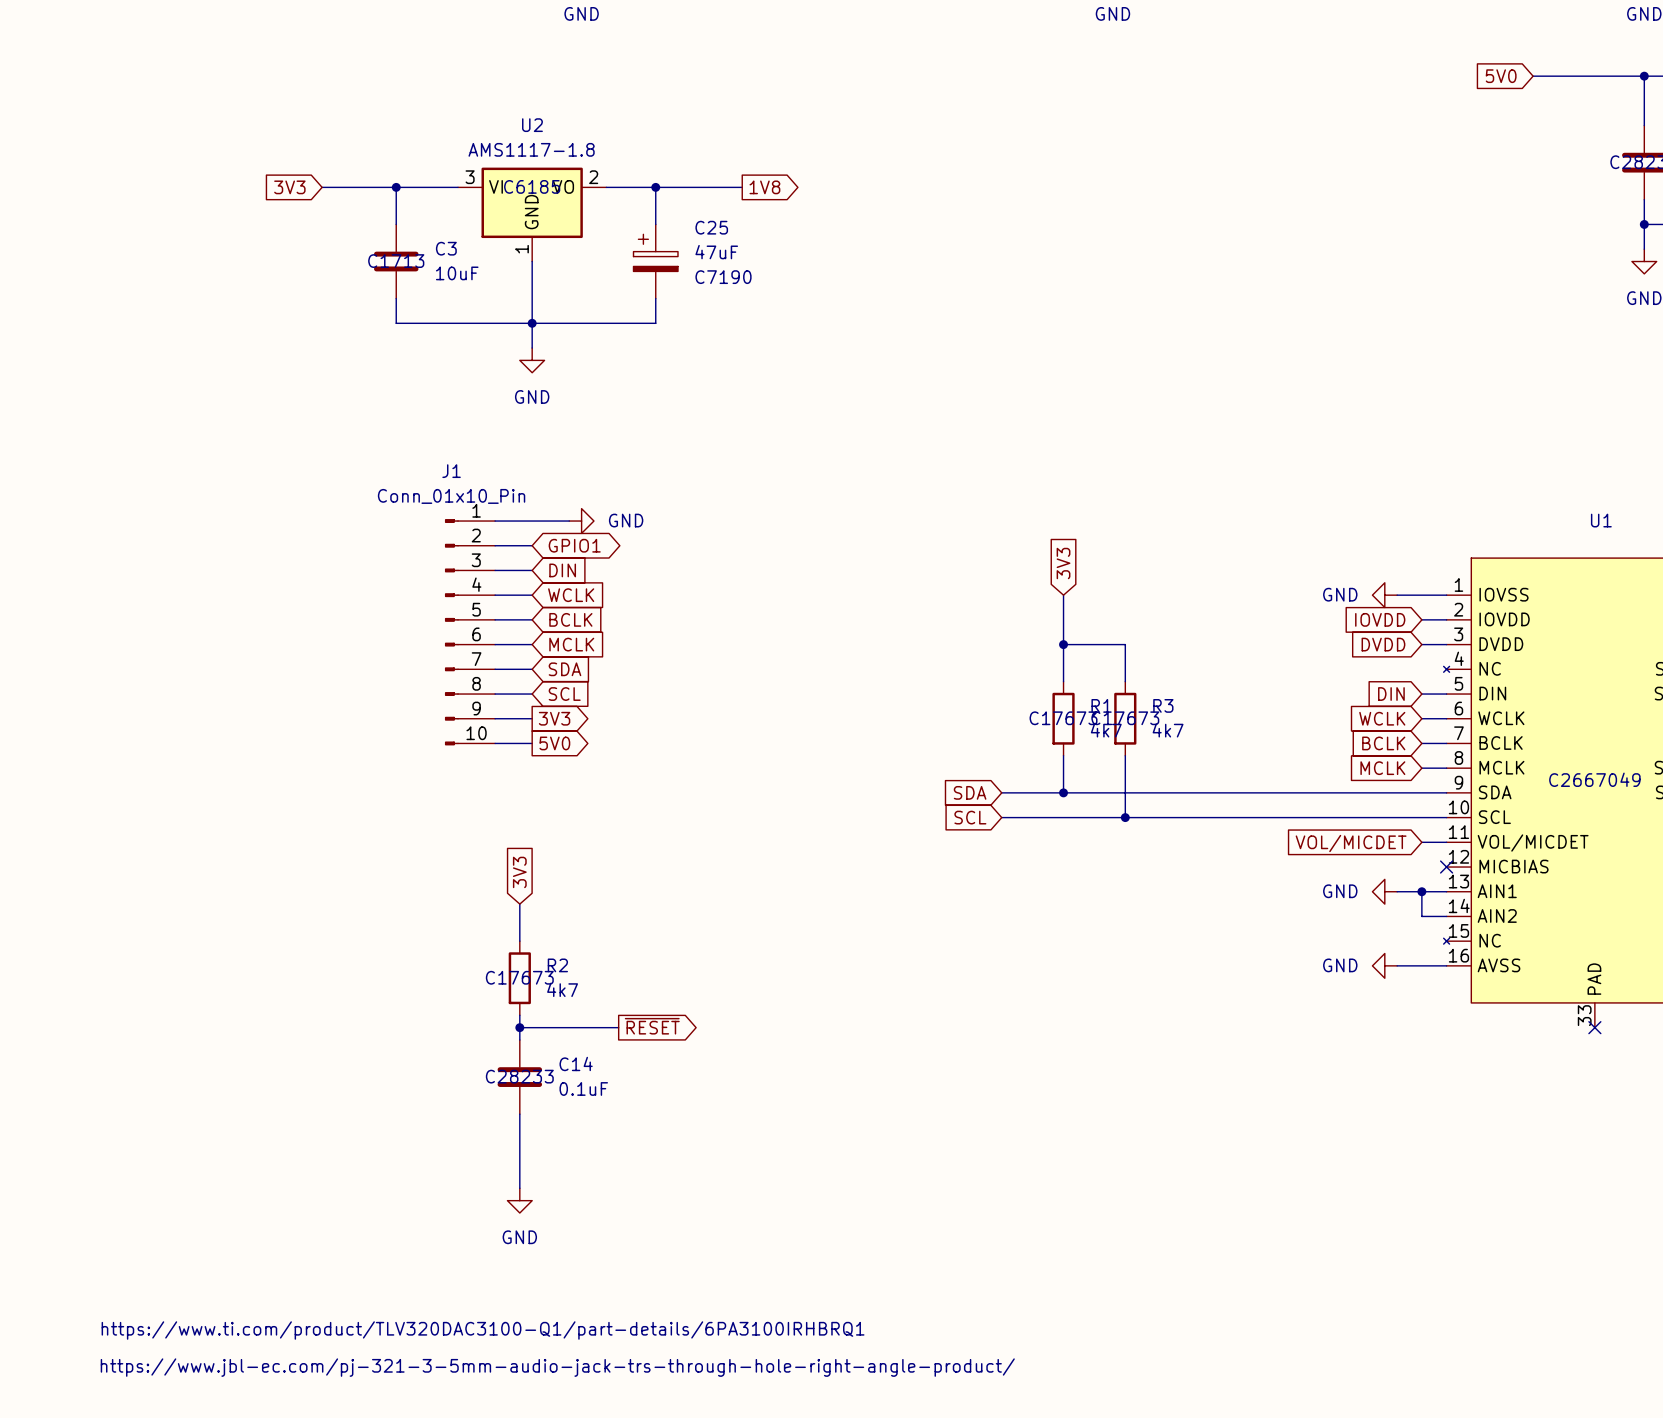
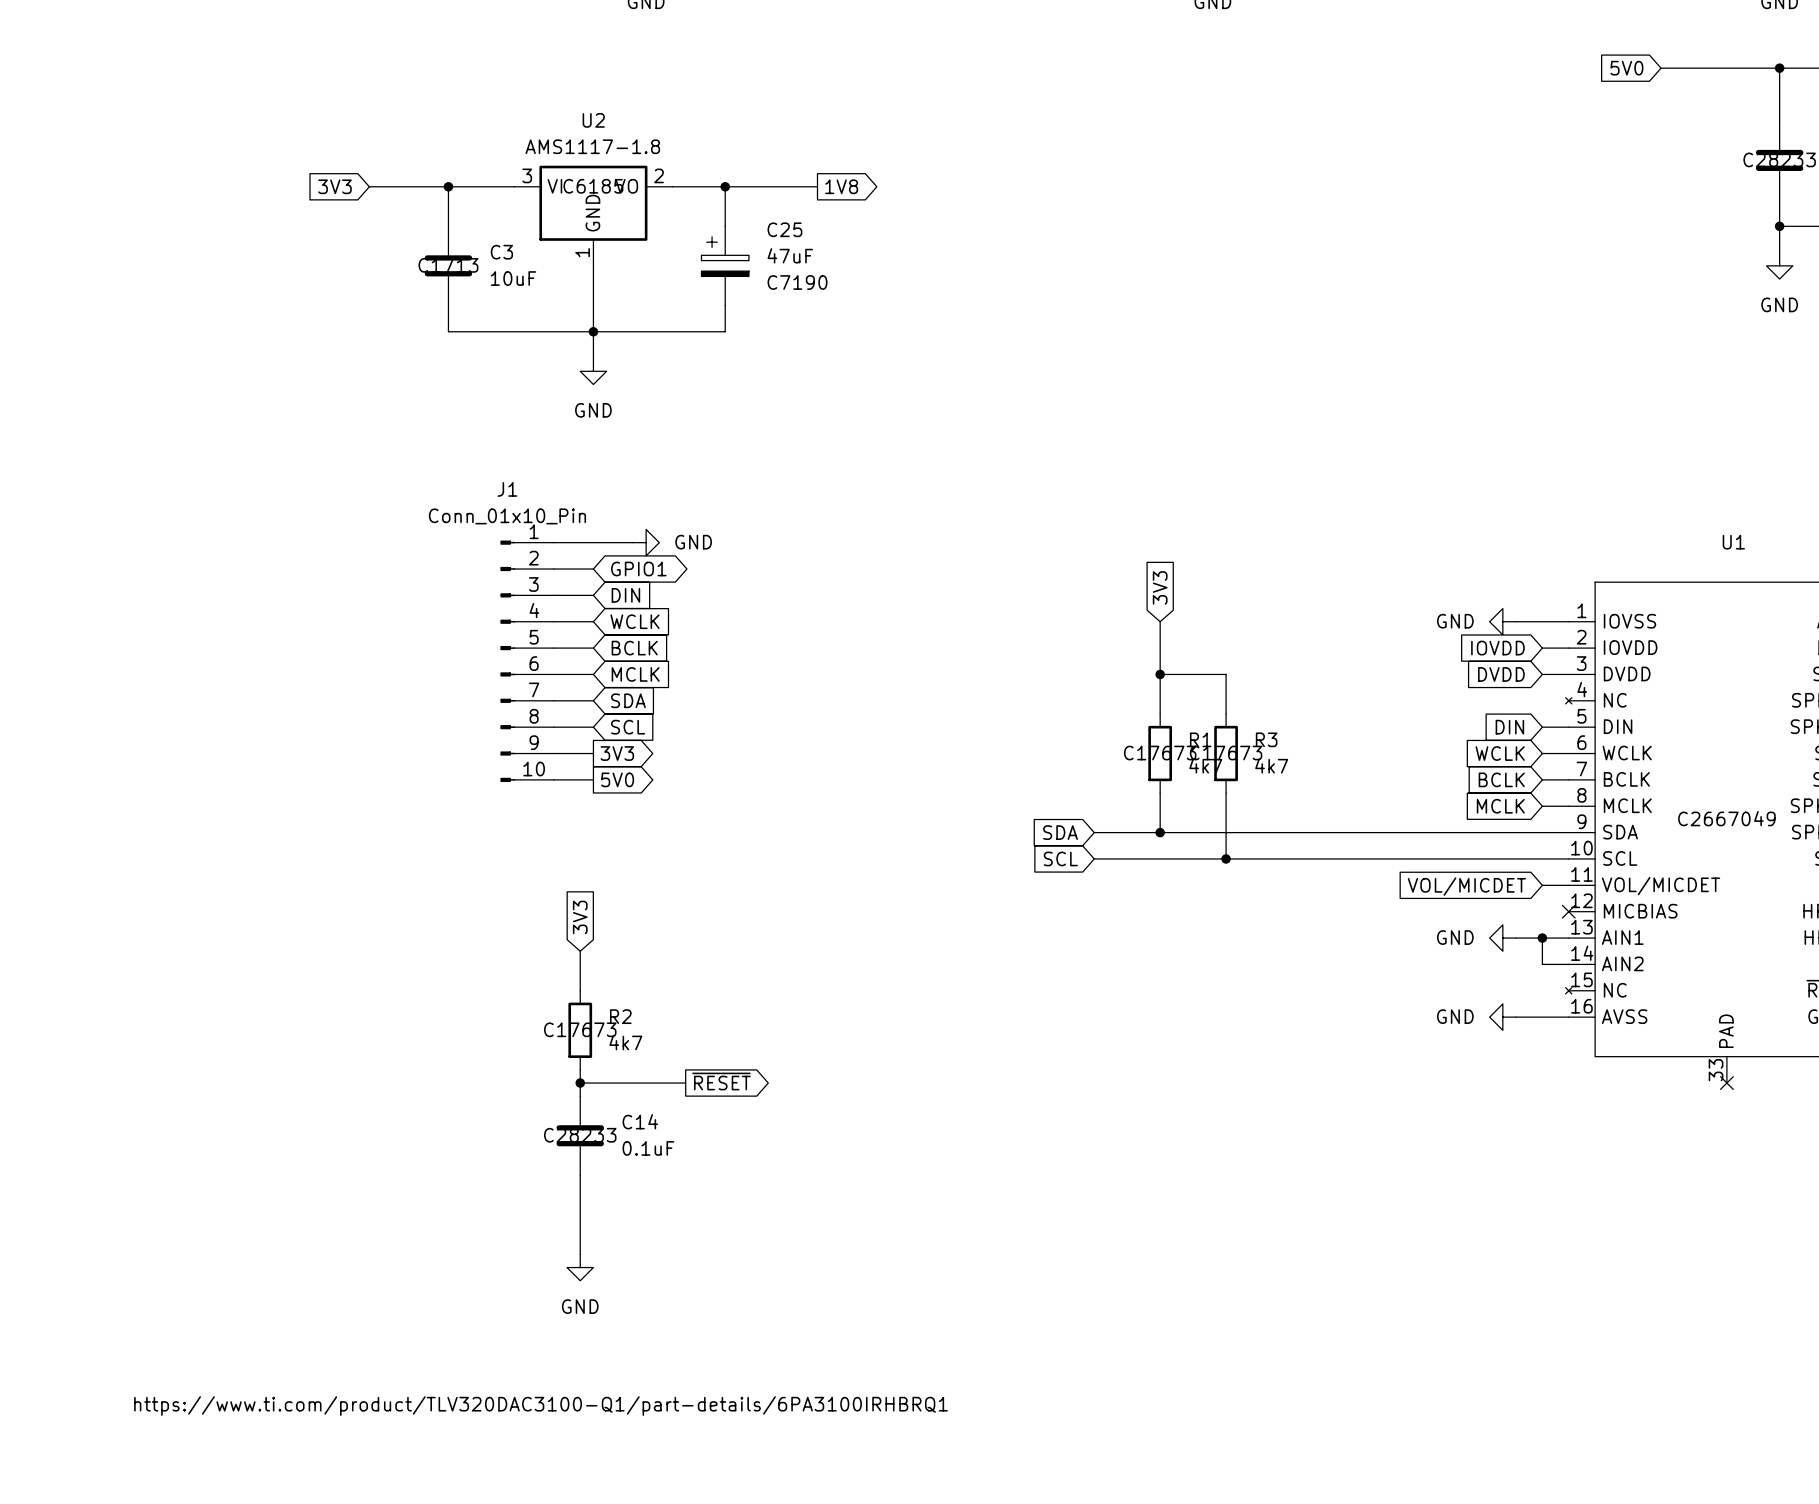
text: https://www.jbl-ec.com/pj-321-3-5mm-audio-jack-trs-through-hole-right-angle-product/ (557, 1367) -> none

